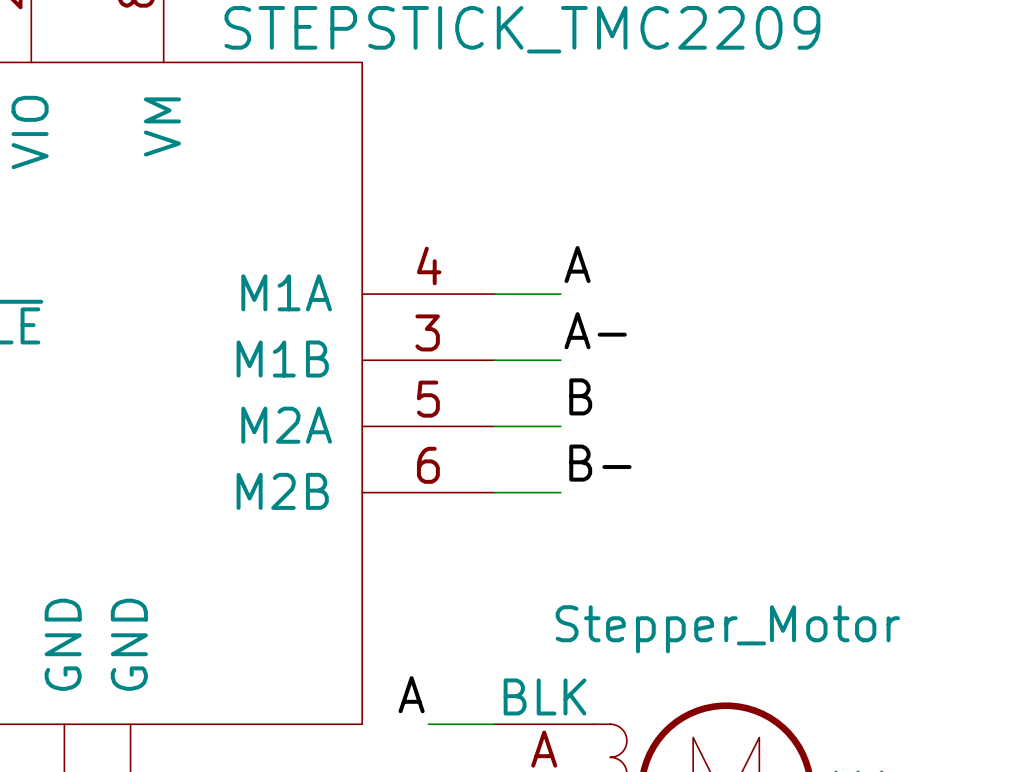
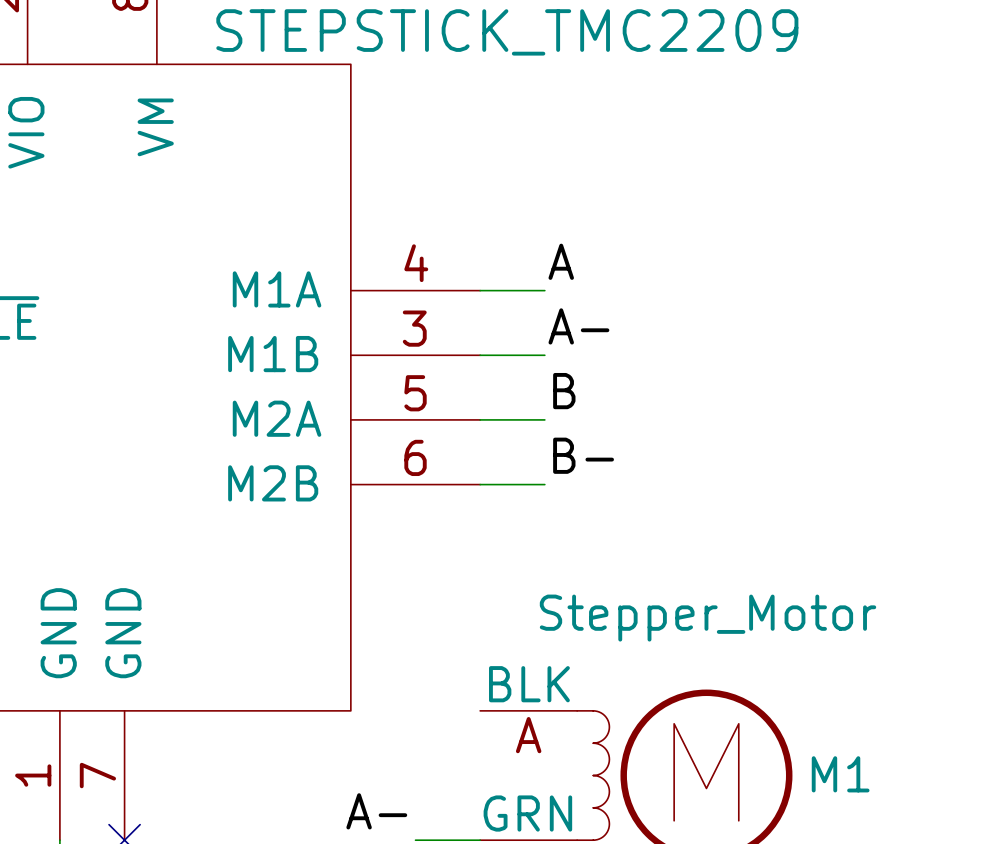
label: A (411, 694) -> none
wire: (428, 724) (494, 724) -> none

